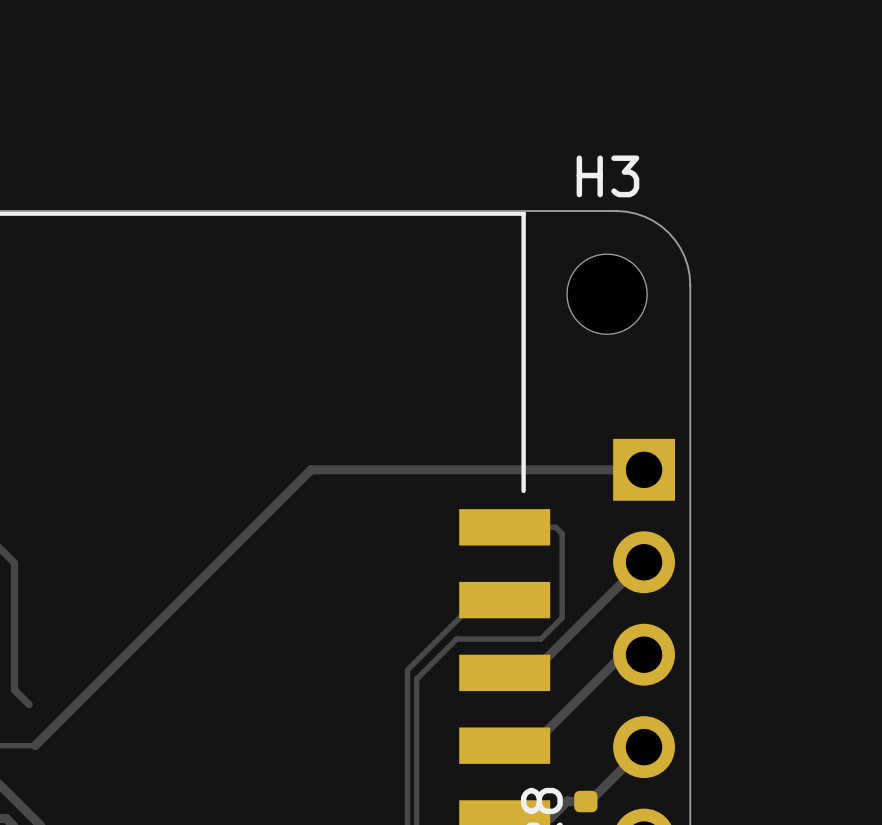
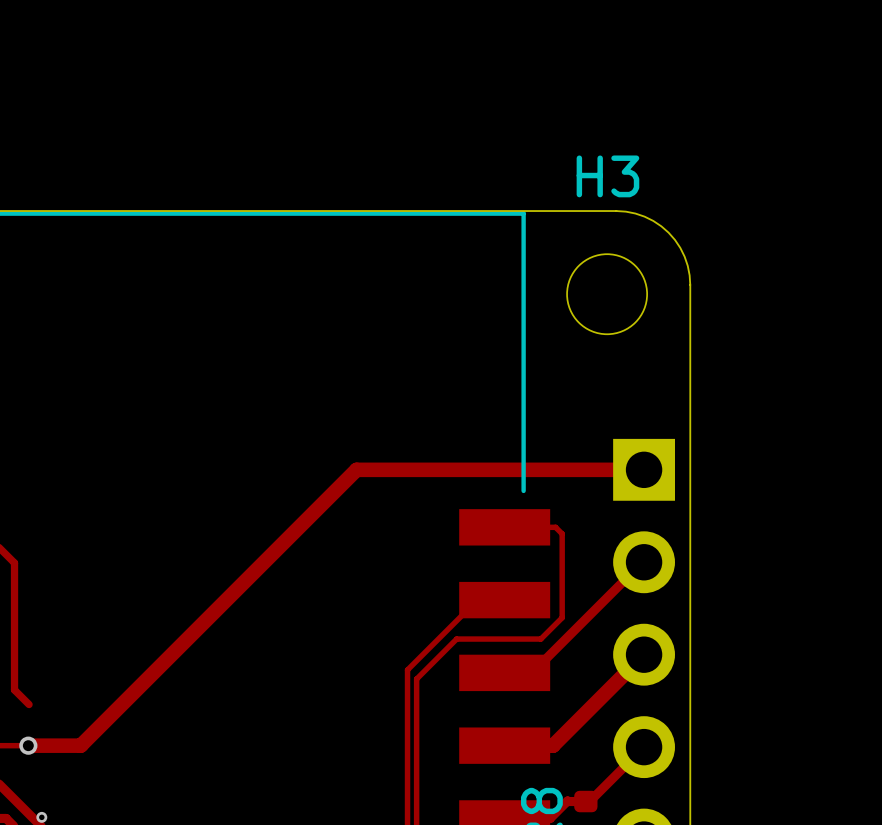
track: (356, 469) (311, 469) (35, 745) -> (356, 469) (80, 745) (35, 745)
track width: thin (356, 469) (644, 469) -> thick (356, 469) (644, 469)
track: (644, 654) (622, 654) (531, 745) -> (644, 654) (553, 745) (531, 745)
via: none -> (28, 745)
via: none -> (41, 817)

